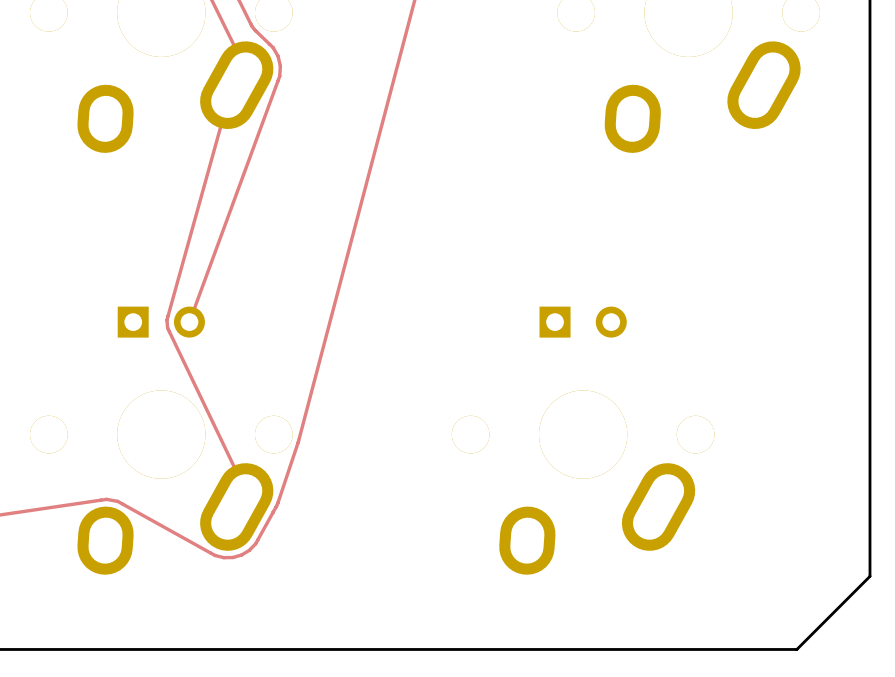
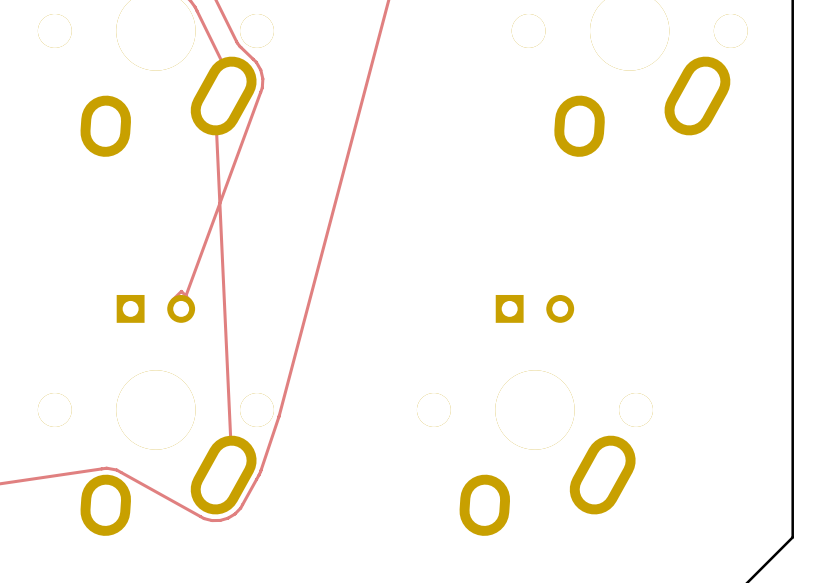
track: (227, 101) (166, 320) (167, 328) (245, 490) -> (215, 110) (231, 460)
track: none -> (172, 300) (181, 291) (190, 300)

